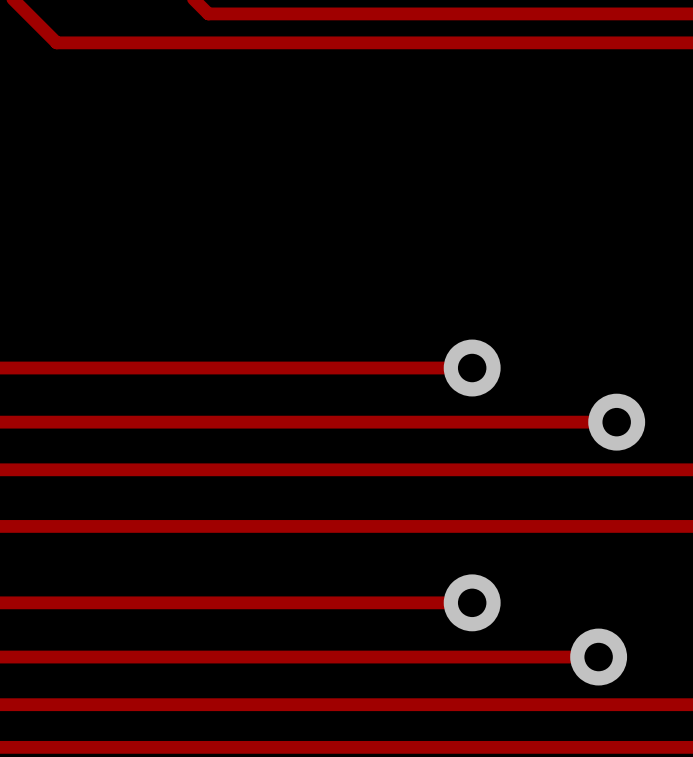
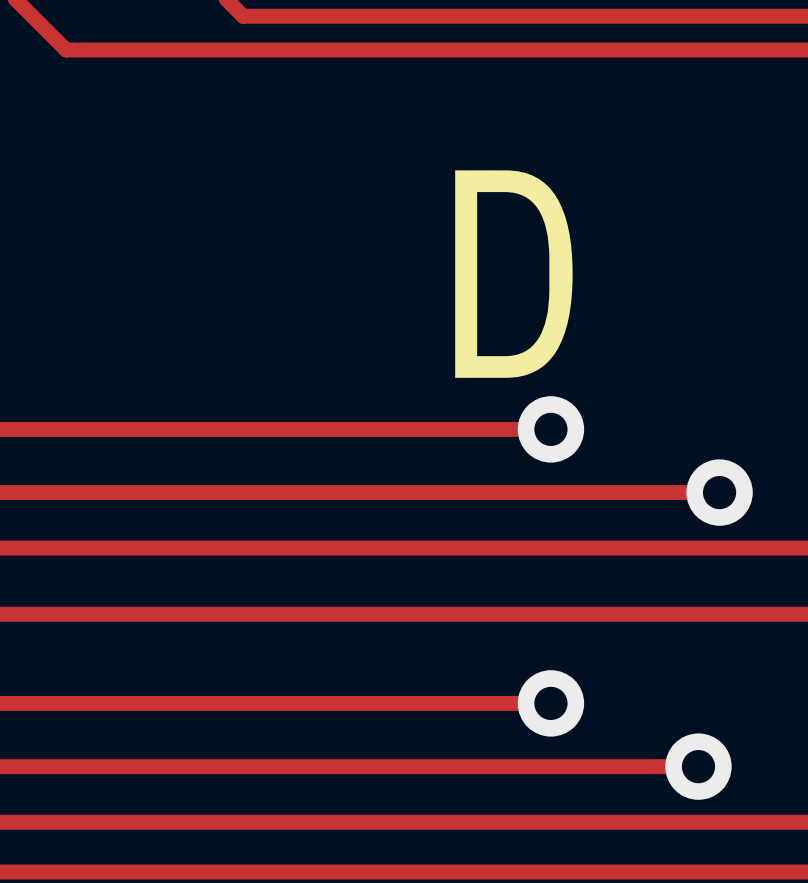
text: none -> D (513, 274)

